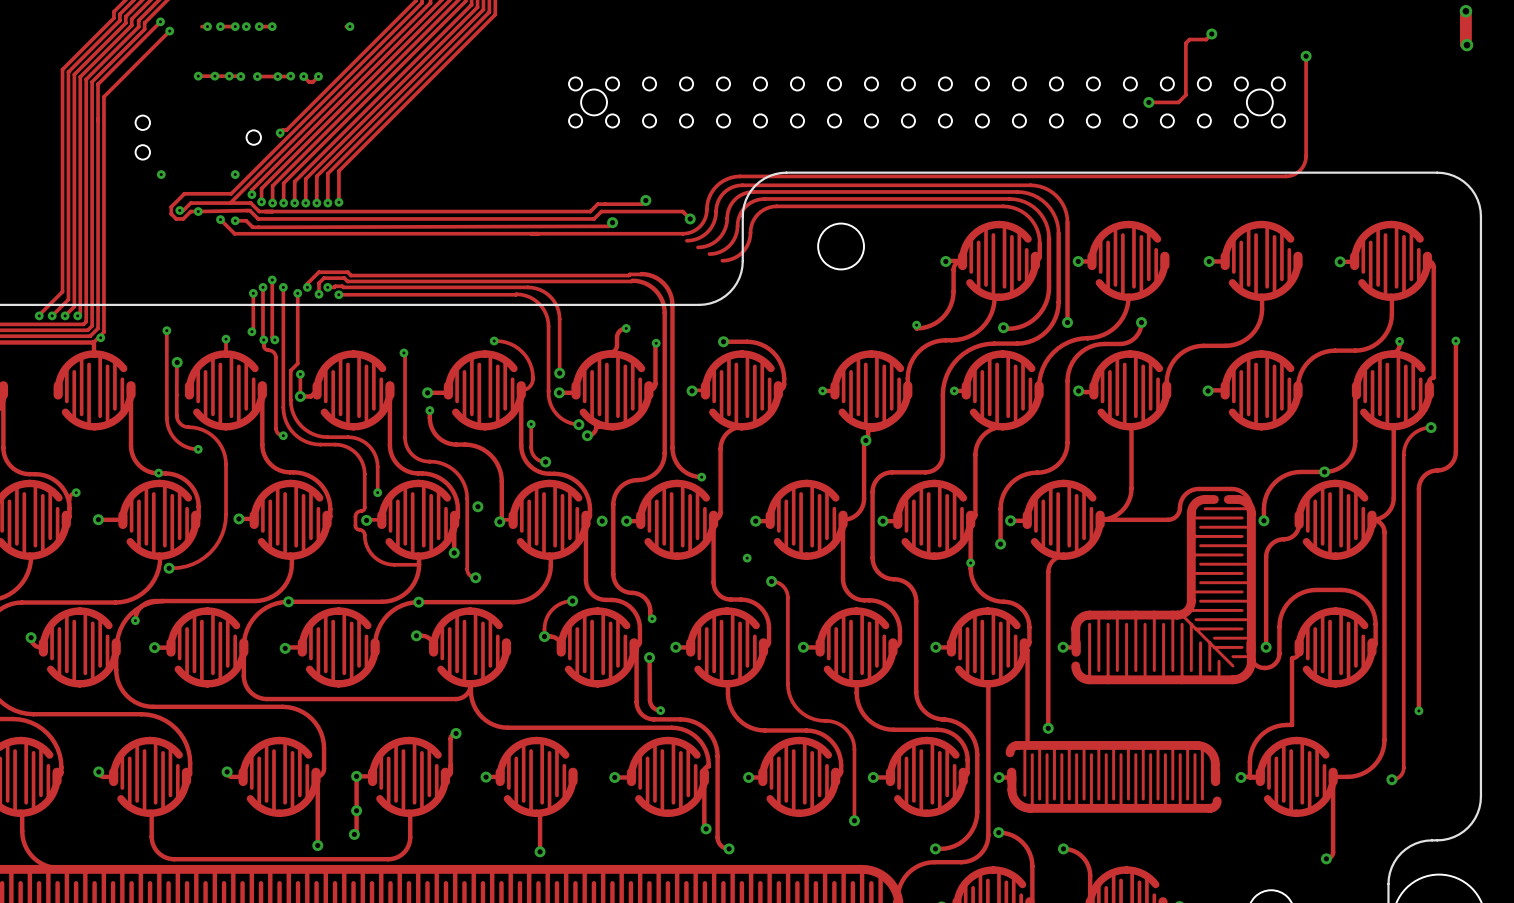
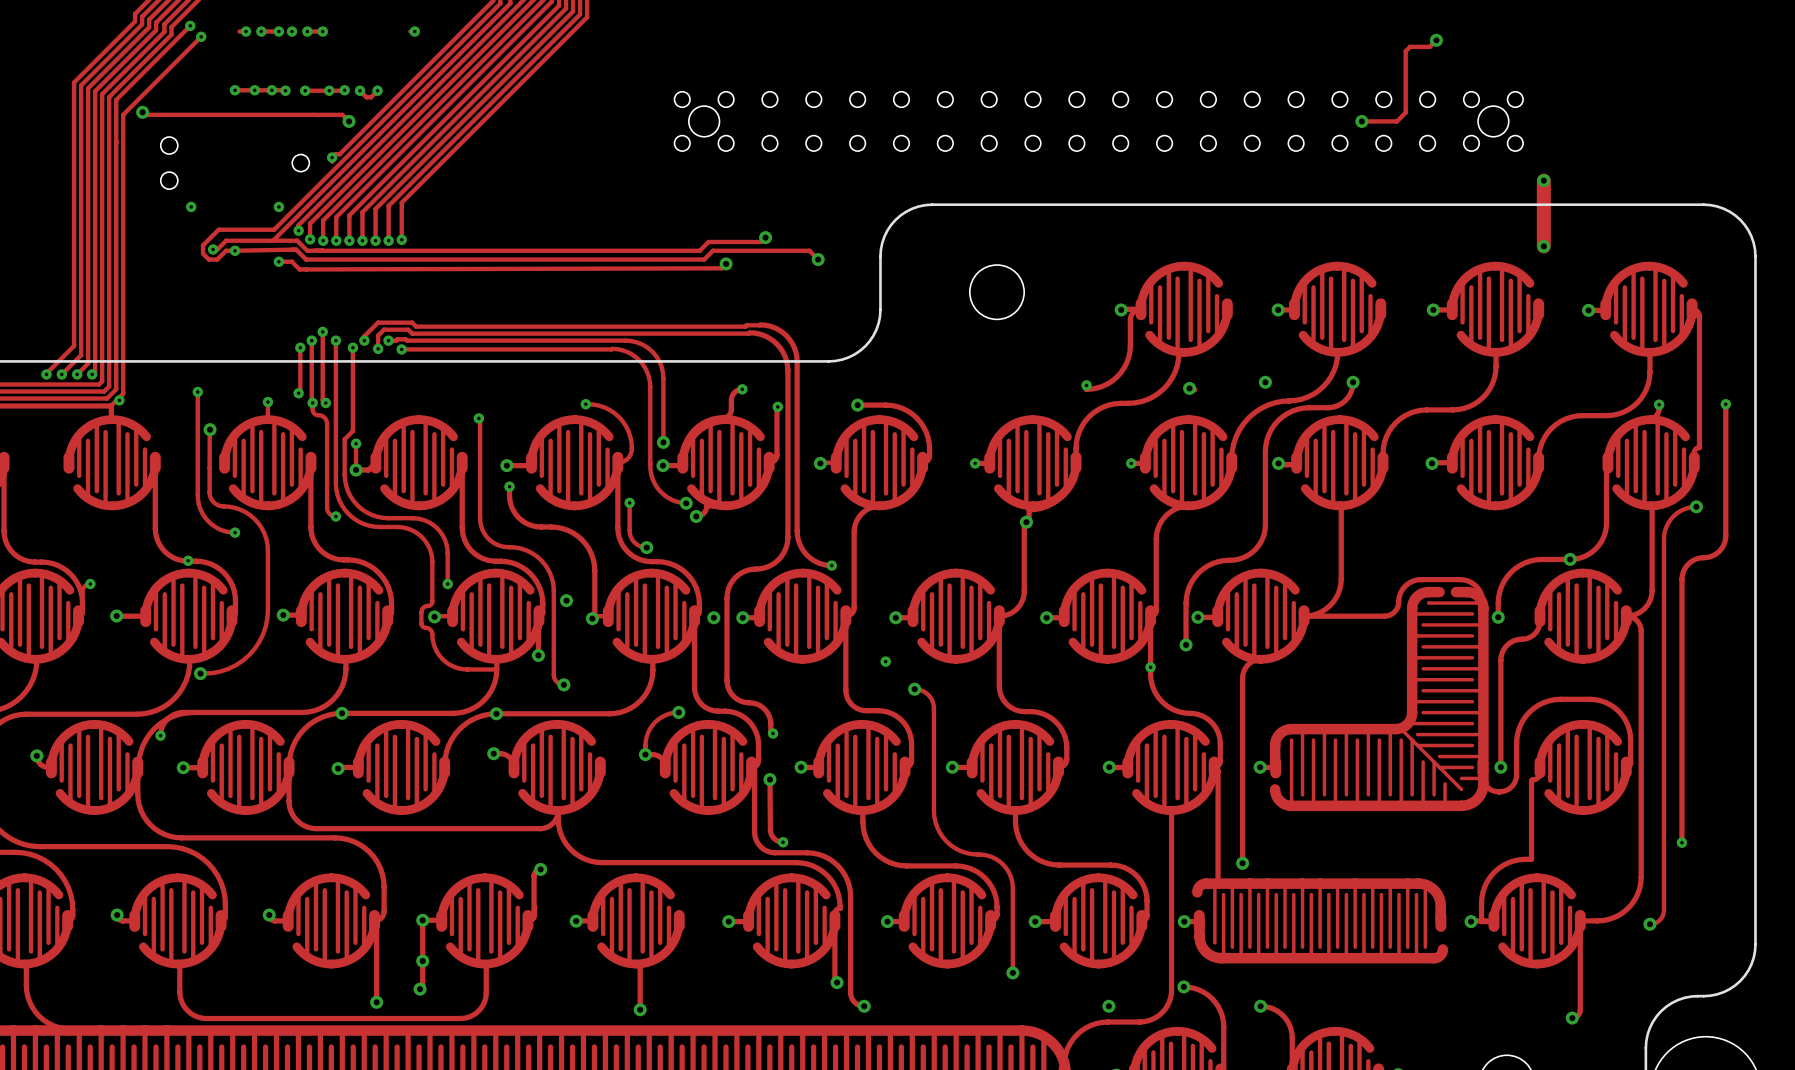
track: (1465, 11) (1466, 45) -> none
via: (1465, 11) -> none
via: (1466, 45) -> none
track: (1306, 56) (1305, 158) (1300, 170) (1288, 176) (735, 176) (723, 180) (713, 189) (708, 201) (705, 218) (699, 226) (692, 231) (682, 233) (234, 233) (220, 219) -> none
via: (1306, 56) -> none
track: none -> (142, 112) (145, 114) (342, 114) (349, 121)
via: none -> (142, 112)
via: none -> (349, 121)
track: none -> (1543, 180) (1543, 246)
via: none -> (1543, 180)
via: none -> (1543, 246)
via: (220, 219) -> none
track: (686, 240) (698, 238) (707, 232) (713, 222) (717, 204) (721, 195) (729, 188) (738, 185) (1040, 186) (1056, 196) (1066, 212) (1067, 322) -> none
track: (698, 247) (709, 245) (718, 238) (724, 229) (728, 211) (732, 202) (740, 195) (750, 192) (1022, 192) (1042, 200) (1055, 217) (1058, 233) (1058, 302) (1057, 312) (1050, 327) (1042, 335) (1027, 342) (980, 345) (968, 350) (957, 358) (949, 369) (943, 388) (942, 454) (940, 463) (934, 469) (927, 472) (884, 473) (876, 479) (872, 489) (874, 565) (883, 576) (907, 583) (915, 595) (916, 691) (918, 702) (930, 715) (951, 720) (963, 726) (972, 736) (976, 749) (977, 811) (974, 826) (969, 834) (958, 843) (949, 847) (935, 848) -> none
track: (709, 254) (720, 251) (729, 245) (735, 236) (738, 218) (743, 209) (751, 202) (761, 199) (1019, 200) (1037, 210) (1047, 228) (1048, 293) (1045, 303) (1036, 316) (1023, 325) (1007, 328) -> none
track: (722, 260) (733, 258) (742, 252) (748, 243) (751, 225) (755, 216) (763, 209) (773, 206) (1003, 206) (1021, 211) (1034, 224) (1039, 242) (1039, 257) (1035, 260) -> none

